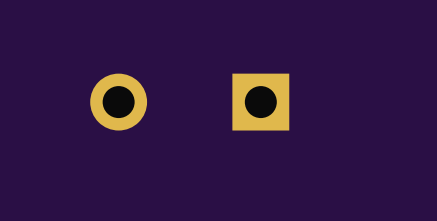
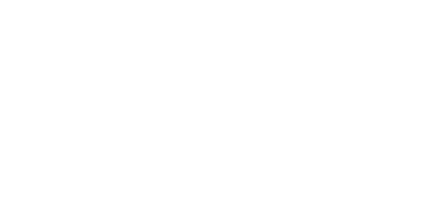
part: (189, 102) -> none

